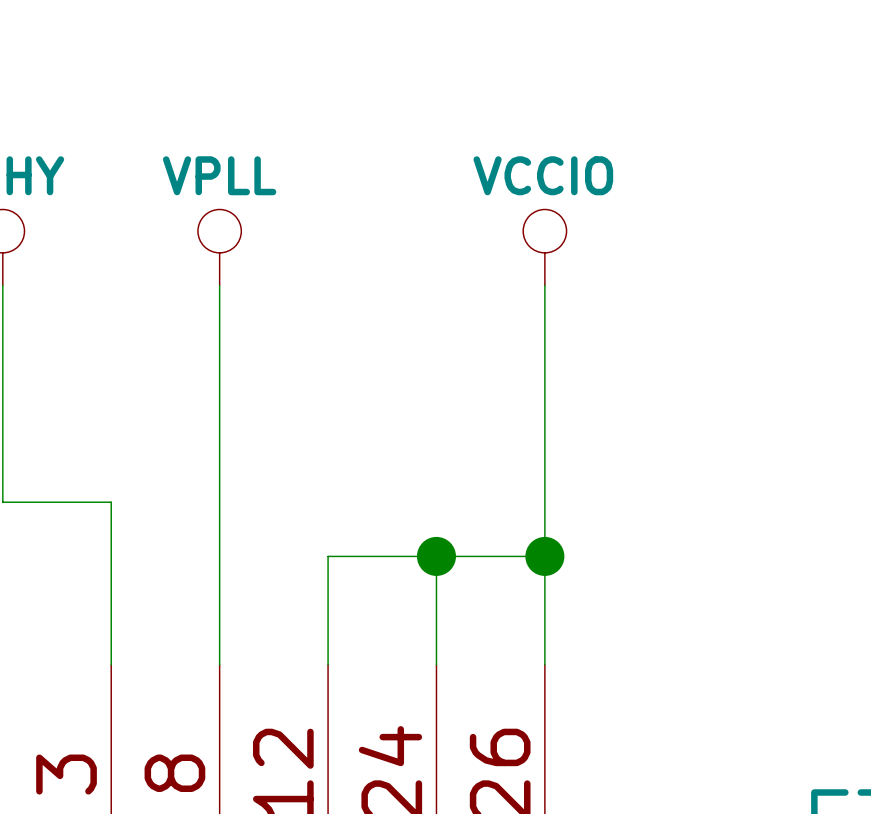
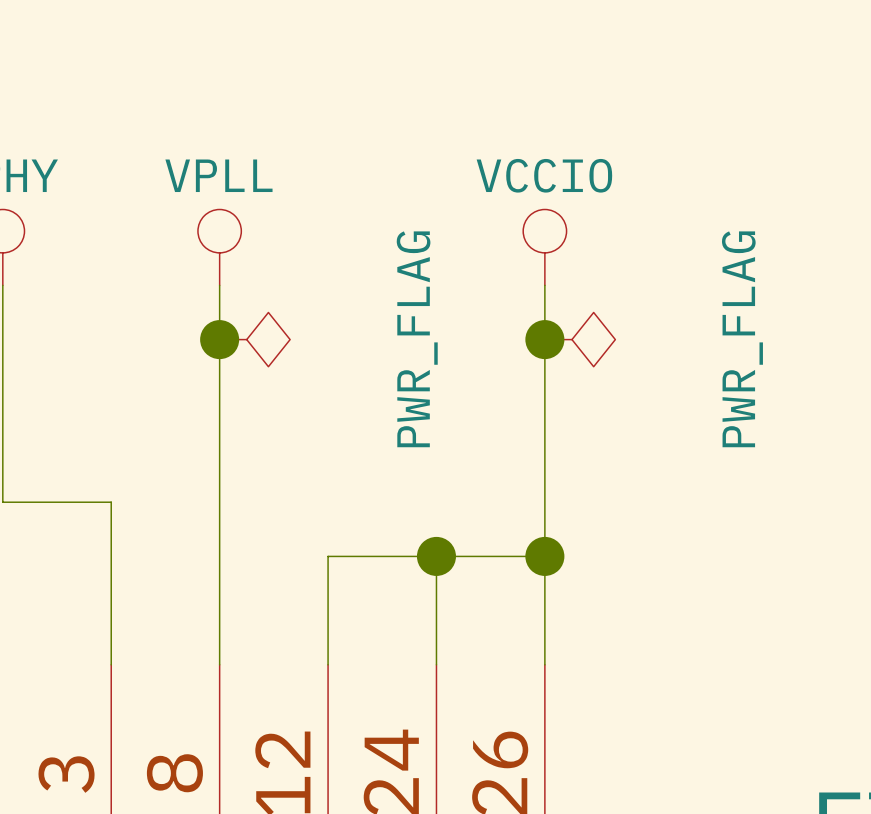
junction: none -> (219, 339)
power symbol: none -> PWR_FLAG (254, 339)
junction: none -> (544, 339)
power symbol: none -> PWR_FLAG (580, 339)

